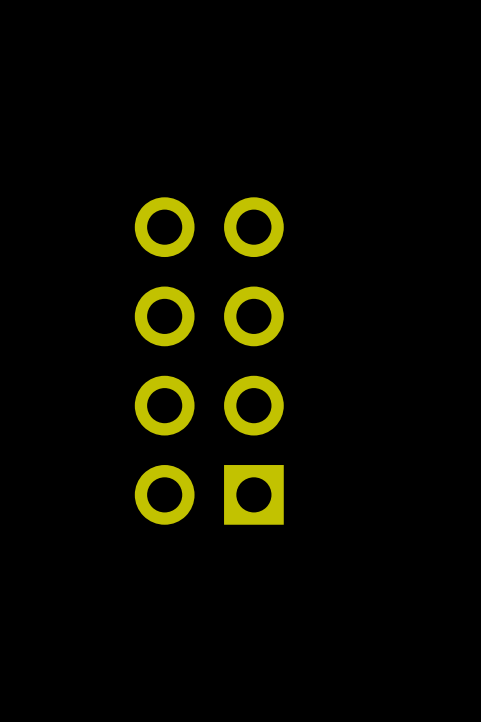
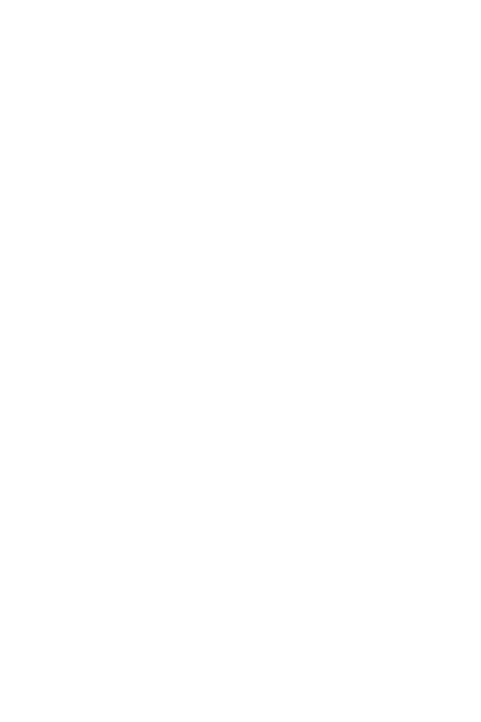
part: (209, 361) -> none

